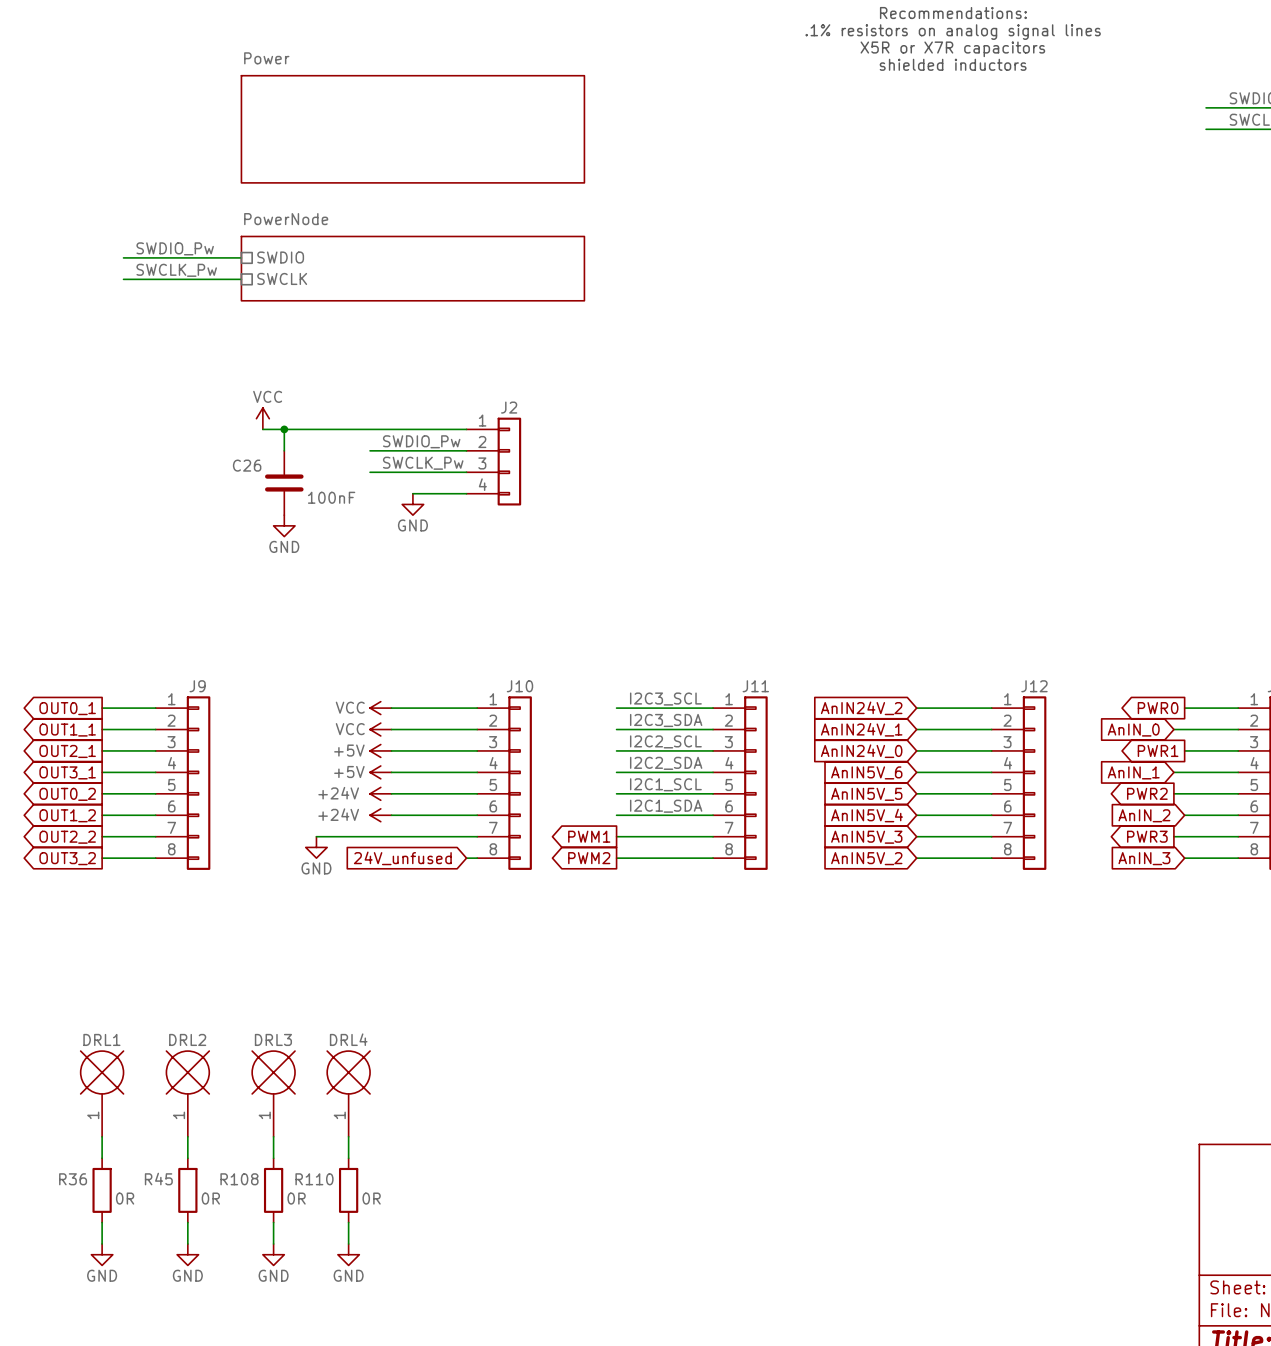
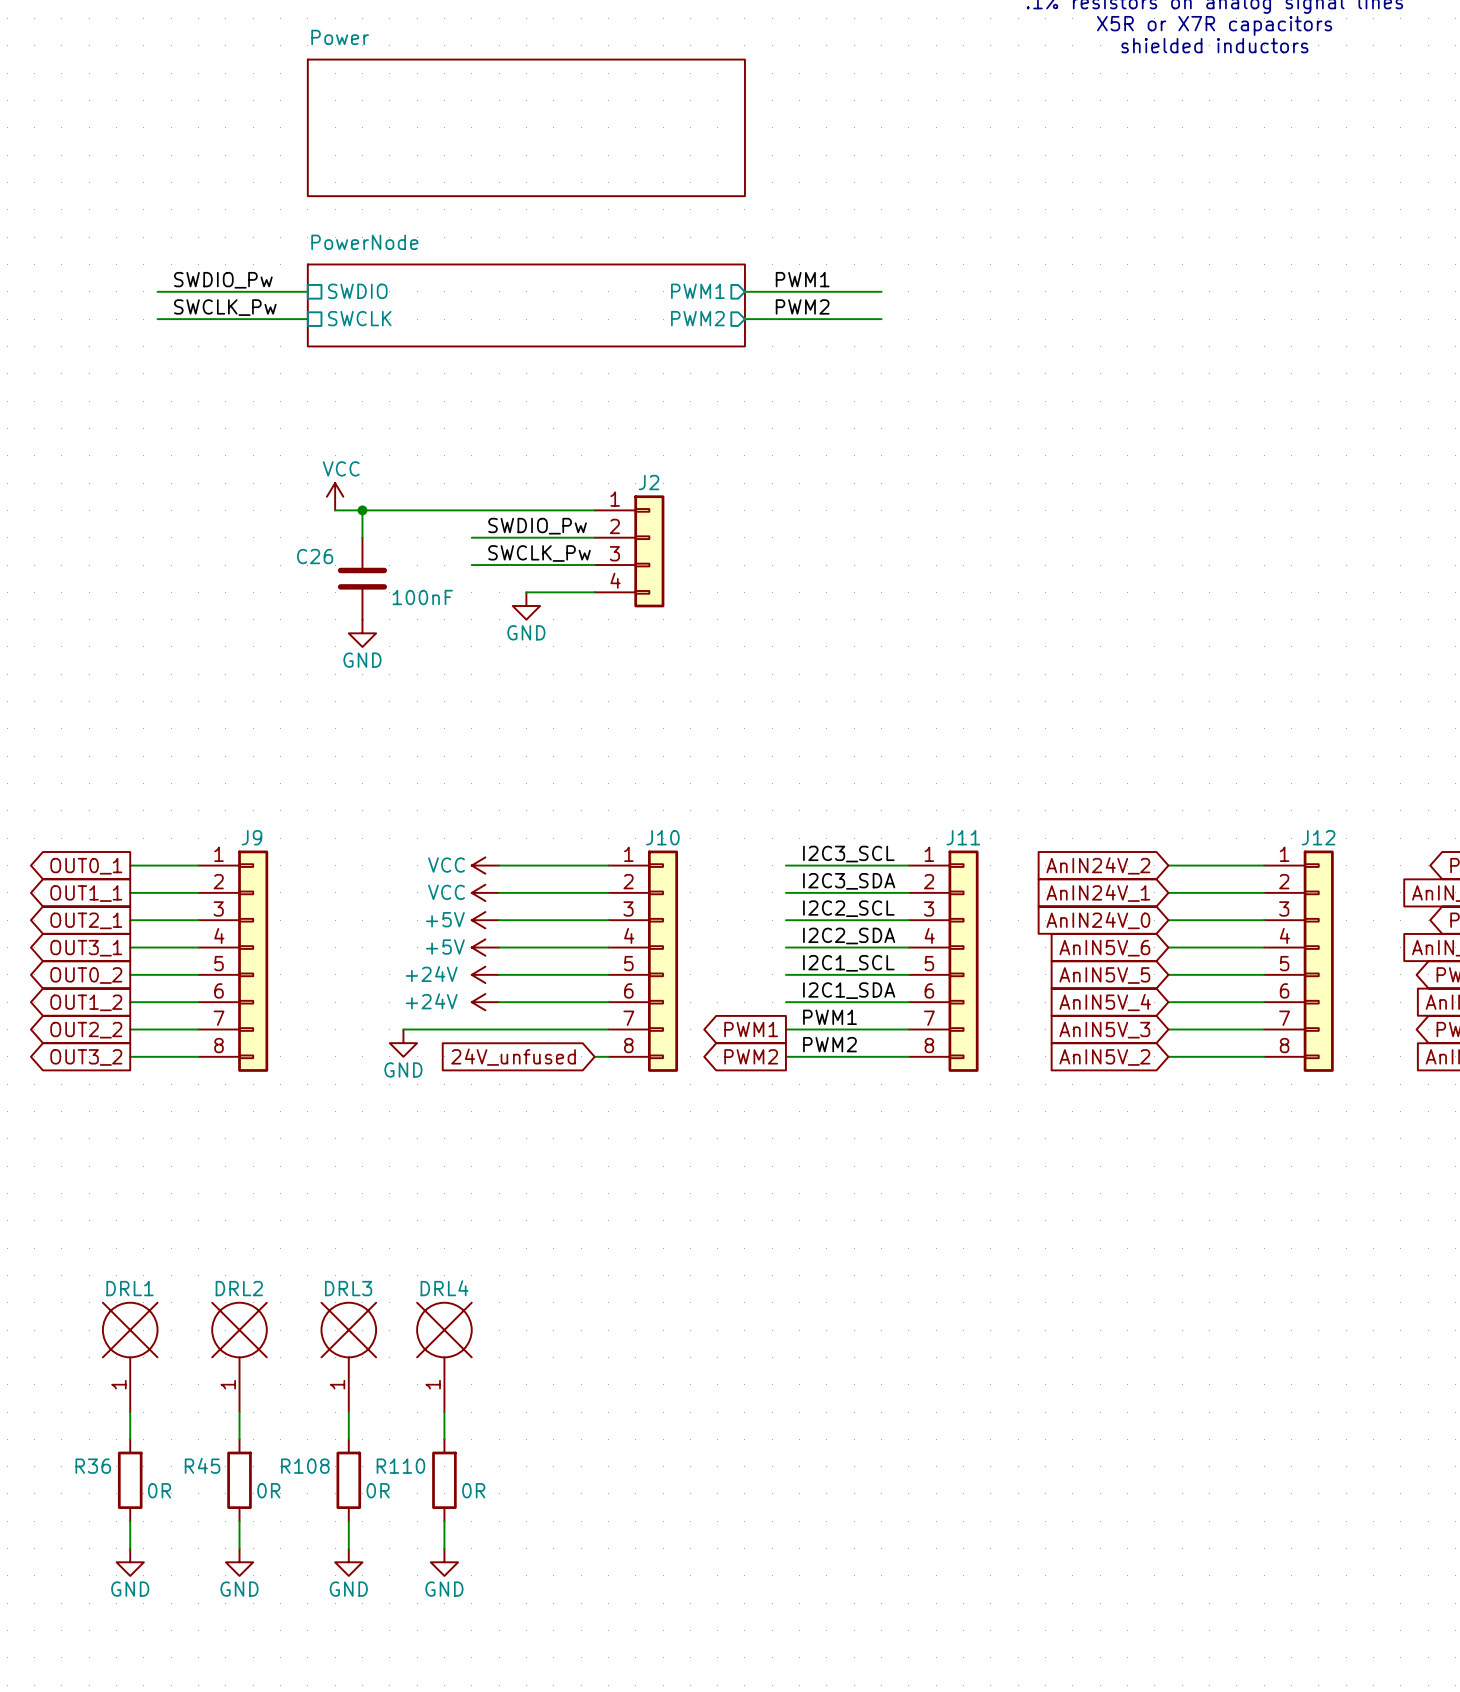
label: none -> PWM1 (802, 279)
sheet pin: none -> PWM1 (697, 291)
wire: none -> (744, 291) (881, 291)
label: none -> PWM2 (802, 306)
sheet pin: none -> PWM2 (697, 318)
wire: none -> (744, 319) (881, 319)
label: none -> PWM1 (829, 1017)
label: none -> PWM2 (829, 1044)

